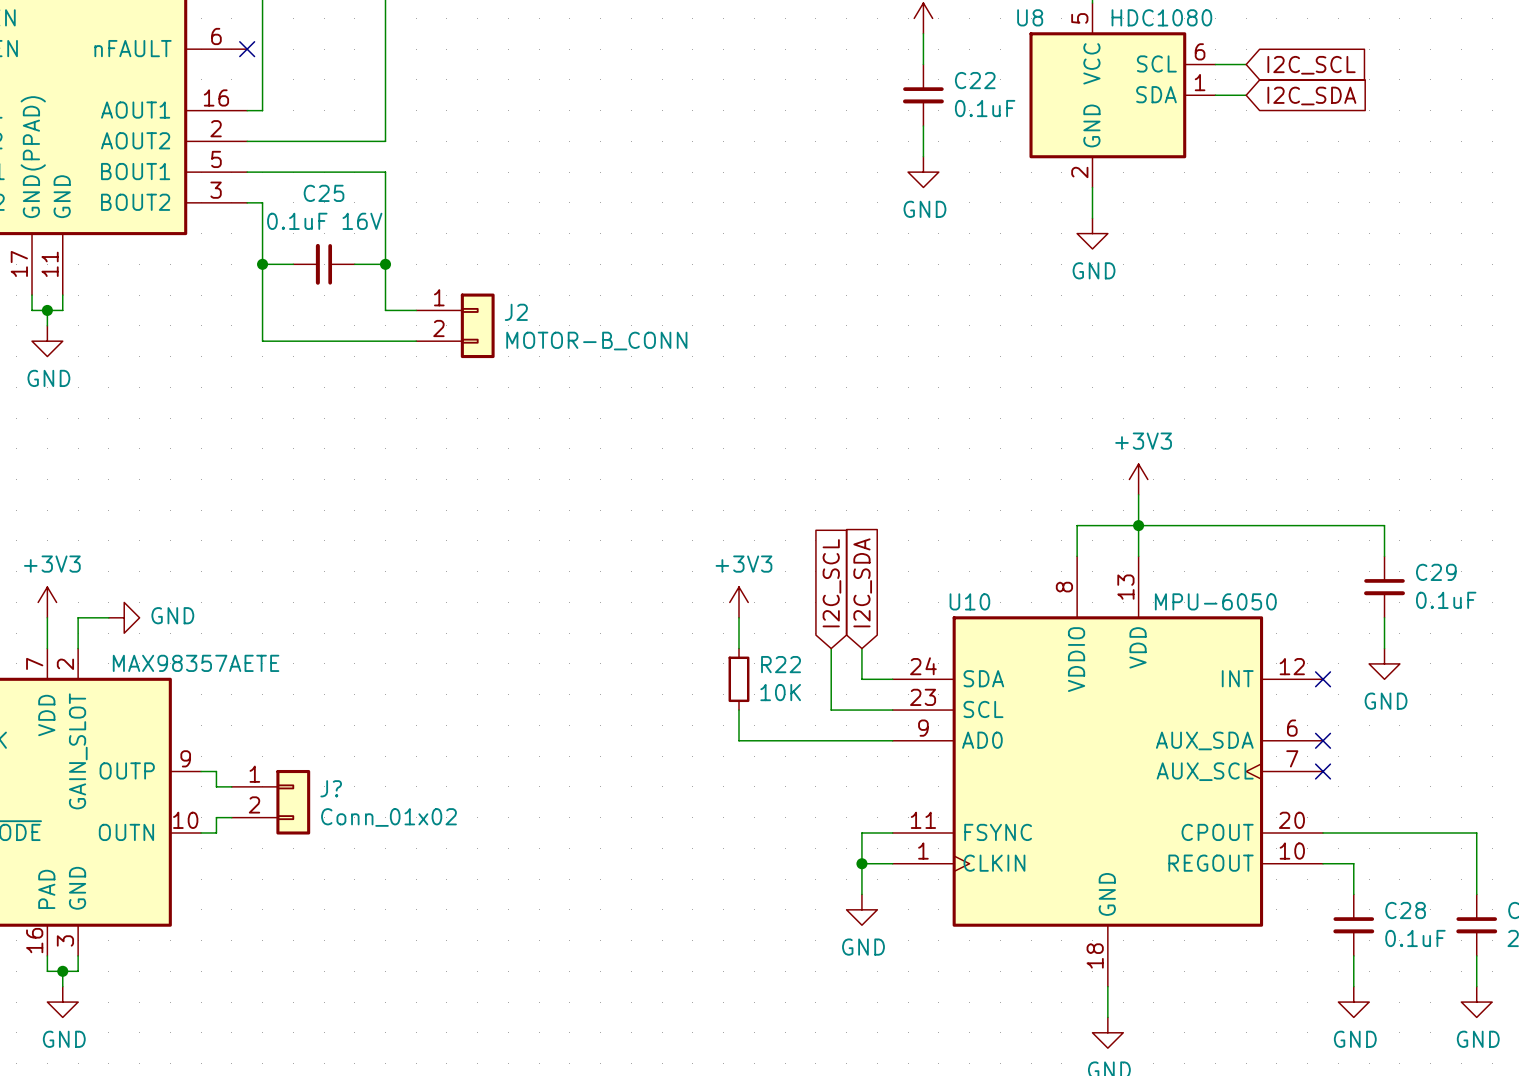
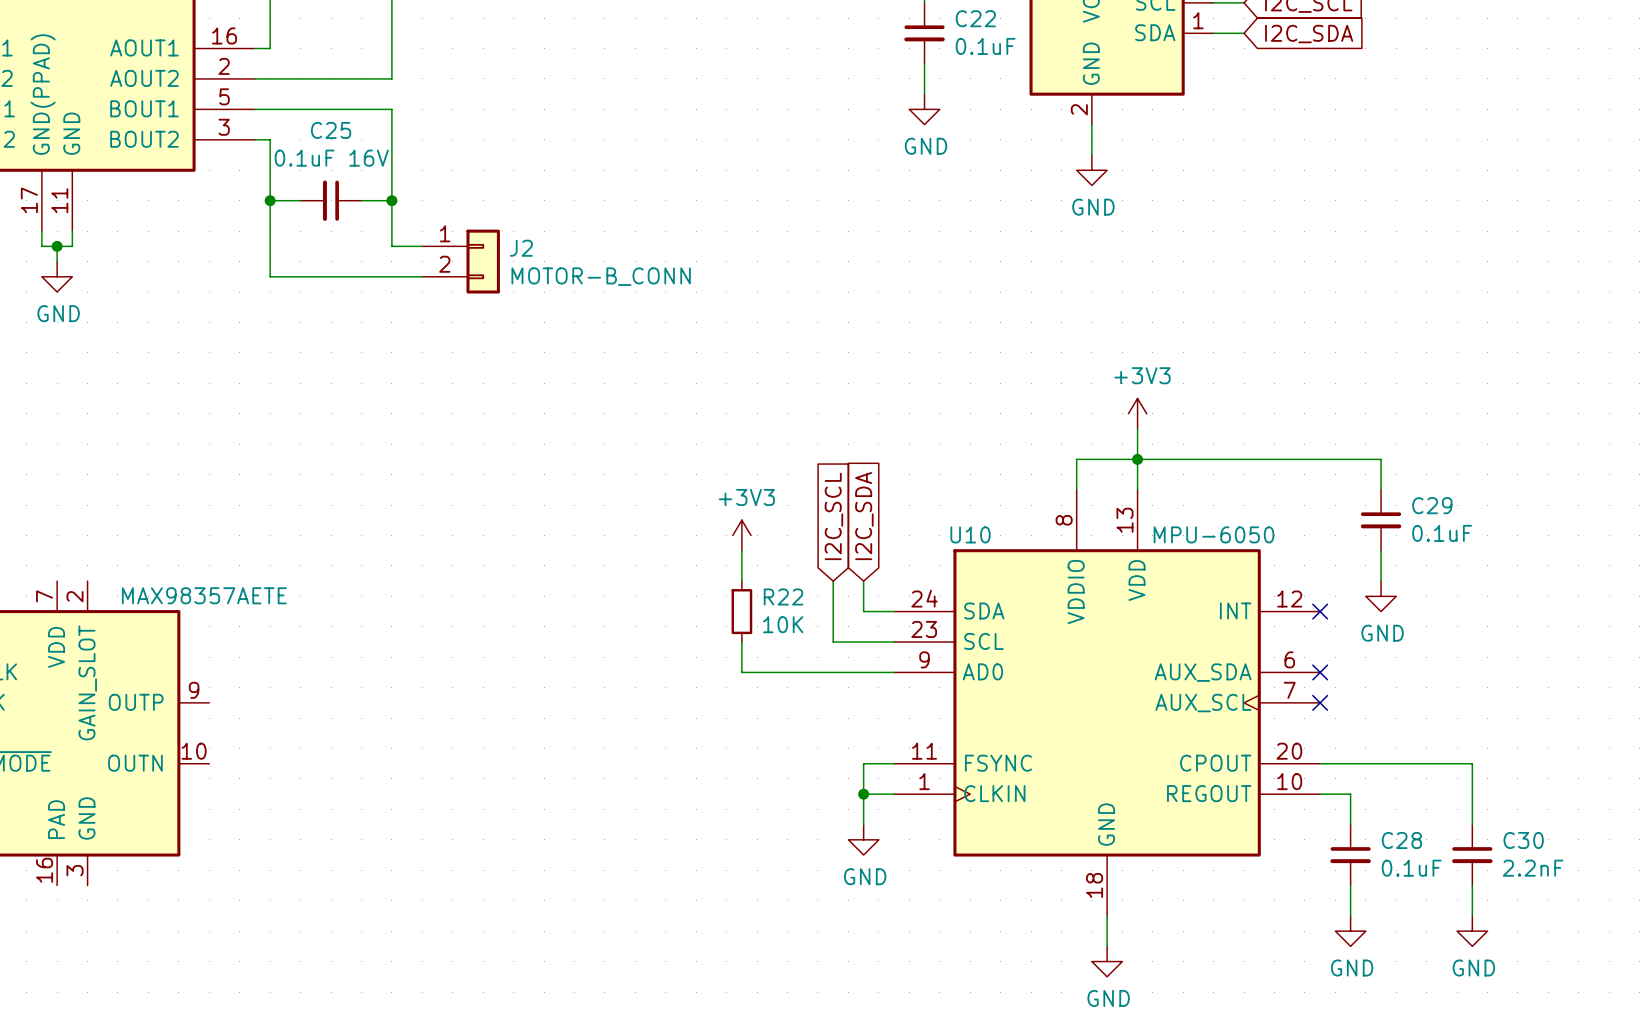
power symbol: +3V3 (47, 602) -> none
wire: (47, 617) (47, 648) -> none
wire: (108, 617) (78, 617) (78, 648) -> none
power symbol: GND (124, 617) -> none
wire: (201, 771) (216, 771) (216, 786) (231, 786) -> none
J?: Conn_01x02 (271, 802) -> none
wire: (231, 817) (216, 817) (216, 832) (201, 832) -> none
wire: (47, 955) (47, 971) (78, 971) (78, 955) -> none
wire: (62, 971) (62, 986) -> none
junction: (62, 971) -> none
power symbol: GND (62, 1002) -> none

